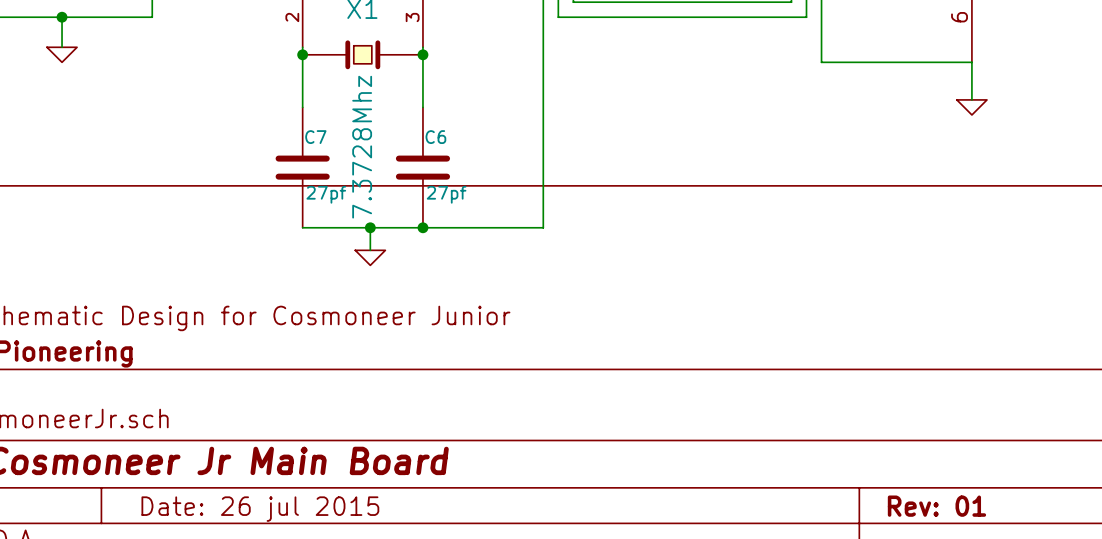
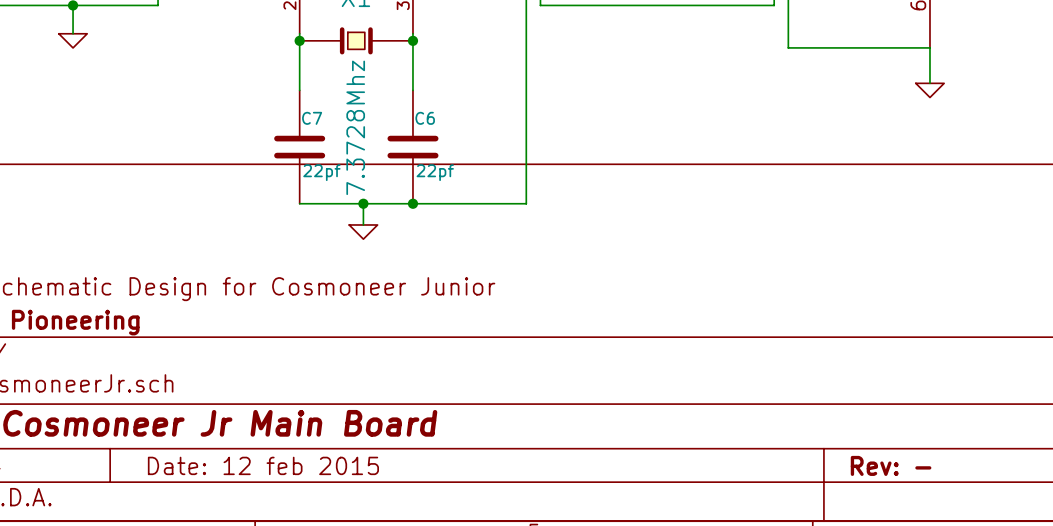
C7 value: 27pf (326, 194) -> 22pf (321, 172)
C6 value: 27pf (446, 194) -> 22pf (435, 172)
title block: Rev: 01 (936, 506) -> Rev: - (891, 465)
title block: Date: 26 jul 2015 (260, 509) -> Date: 12 feb 2015 (263, 465)

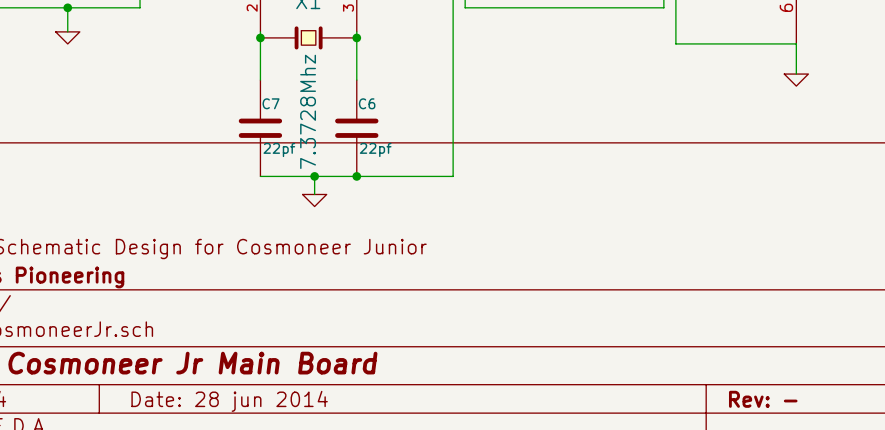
title block: Date: 12 feb 2015 (263, 465) -> Date: 28 jun 2014 (229, 401)

